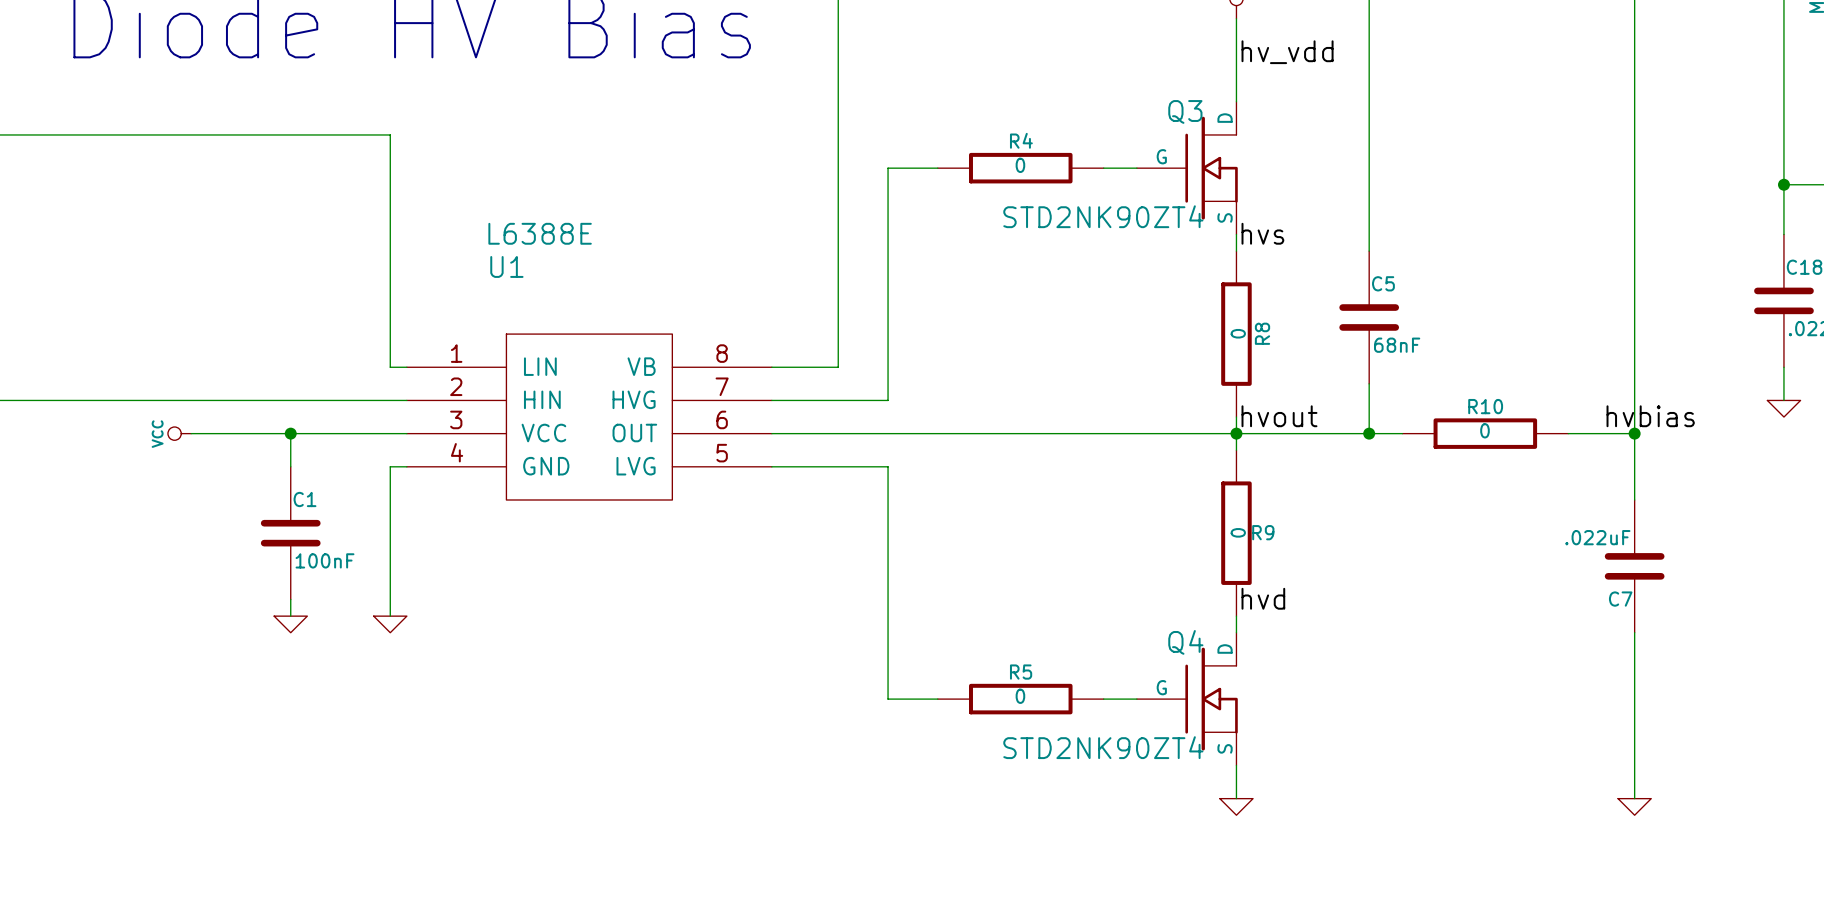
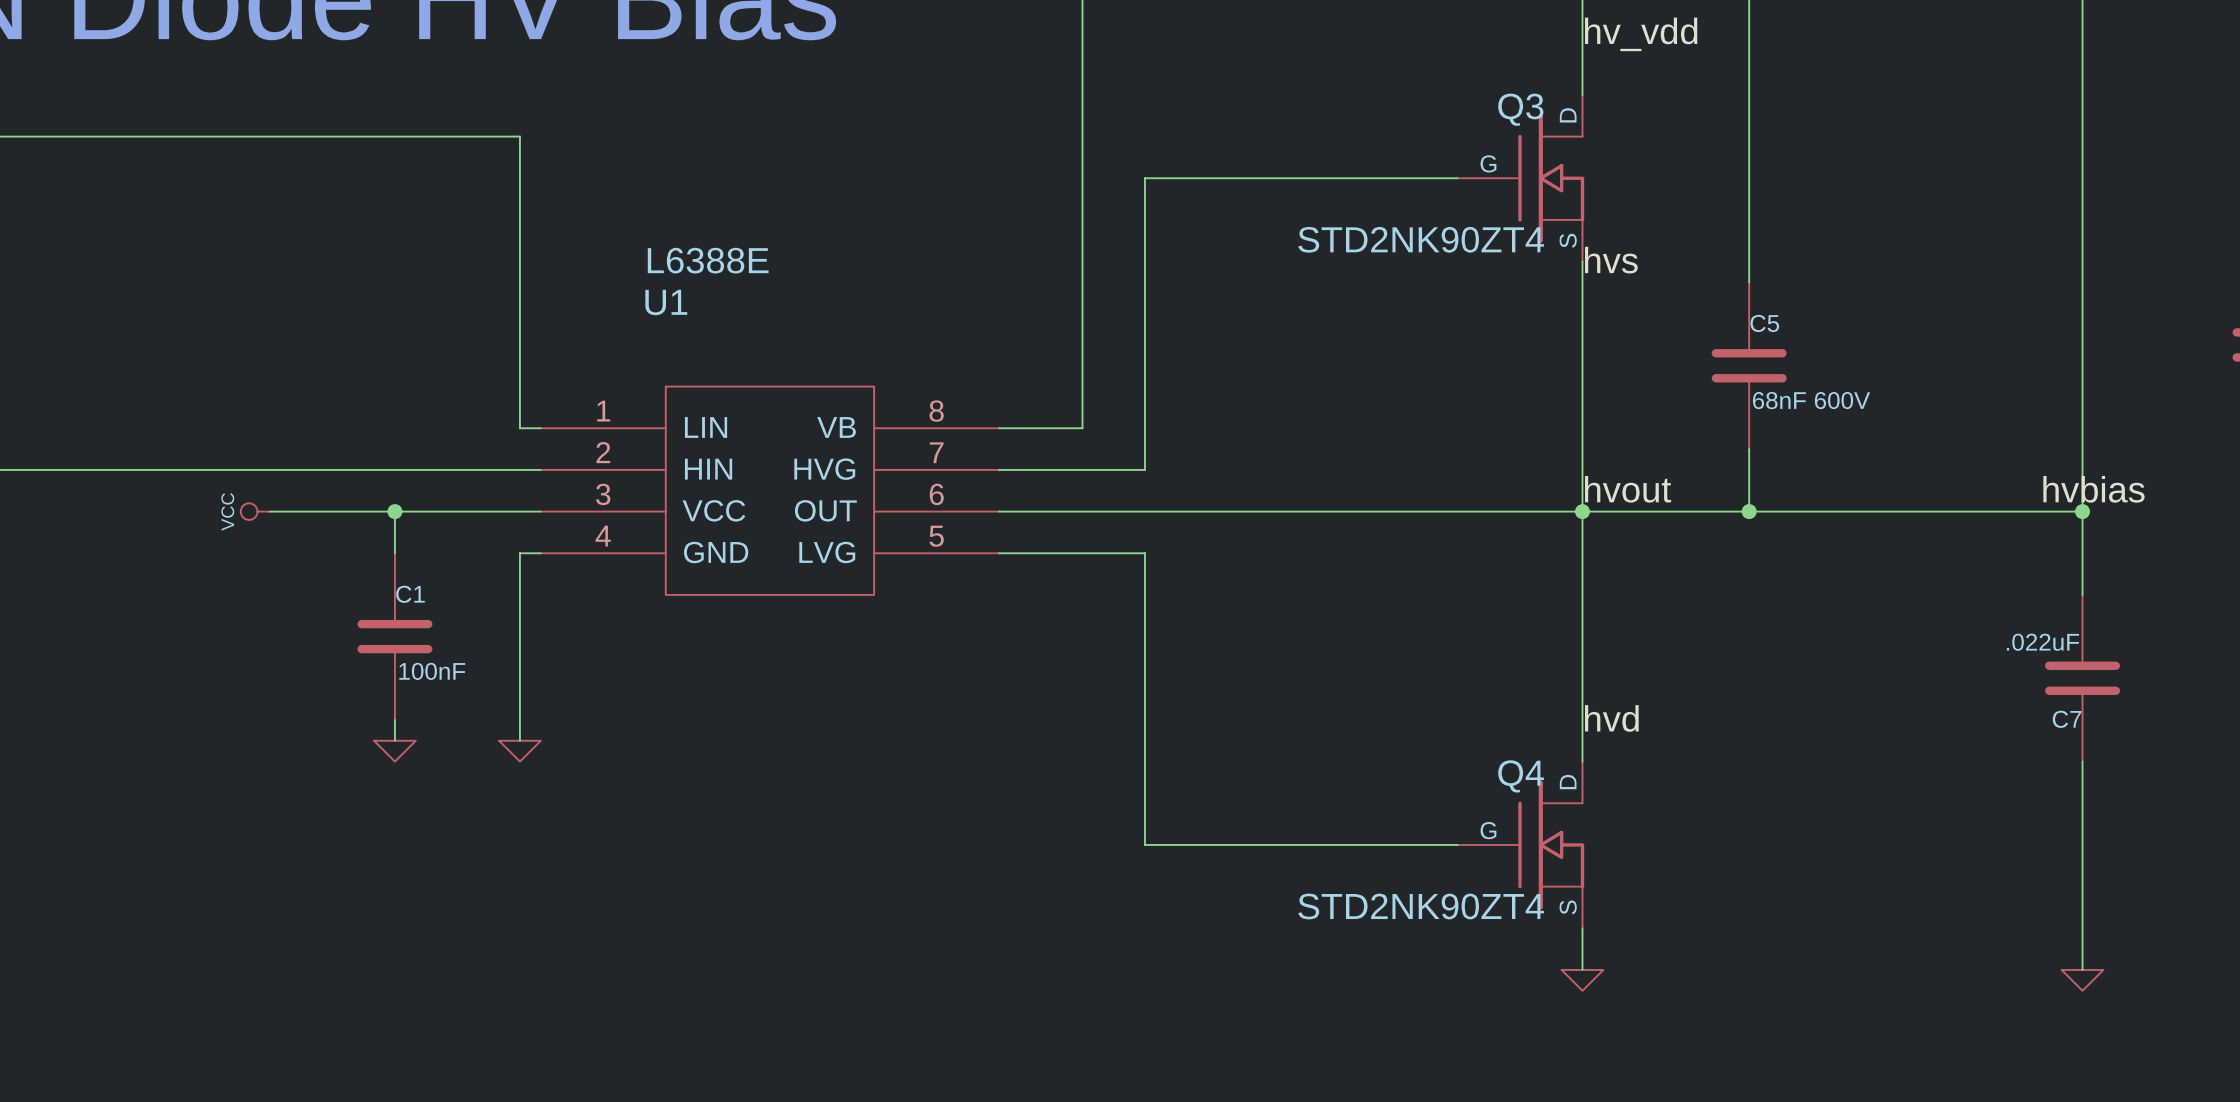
wire: none -> (1207, 178) (1415, 178)
R4: 0 (1020, 168) -> none
wire: none -> (1582, 282) (1582, 490)
R8: 0 (1236, 334) -> none
C5 value: 68nF (1397, 345) -> 68nF 600V (1811, 400)
wire: none -> (1790, 511) (1999, 511)
R10: 0 (1485, 433) -> none
wire: none -> (1582, 532) (1582, 740)
R9: 0 (1236, 533) -> none
wire: none -> (1207, 844) (1415, 844)
R5: 0 (1020, 699) -> none

